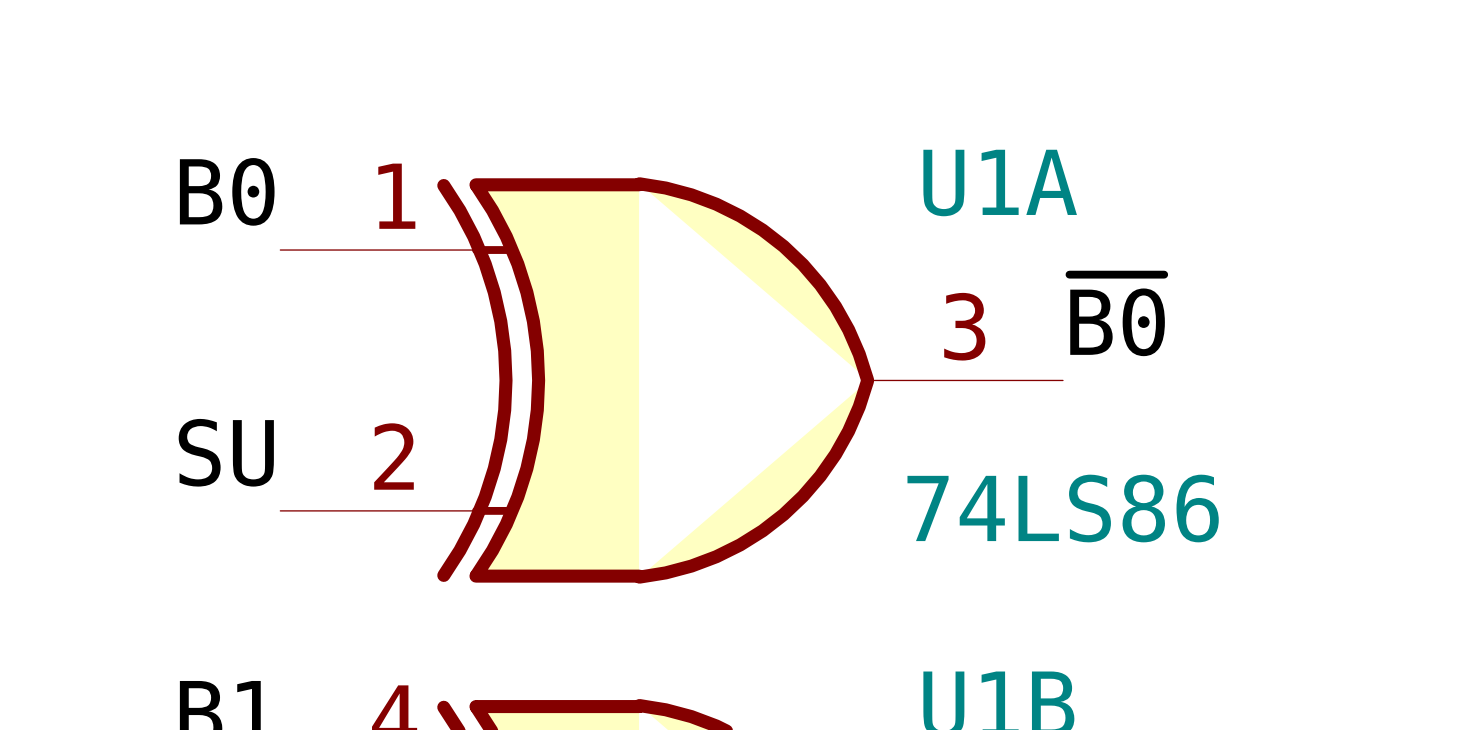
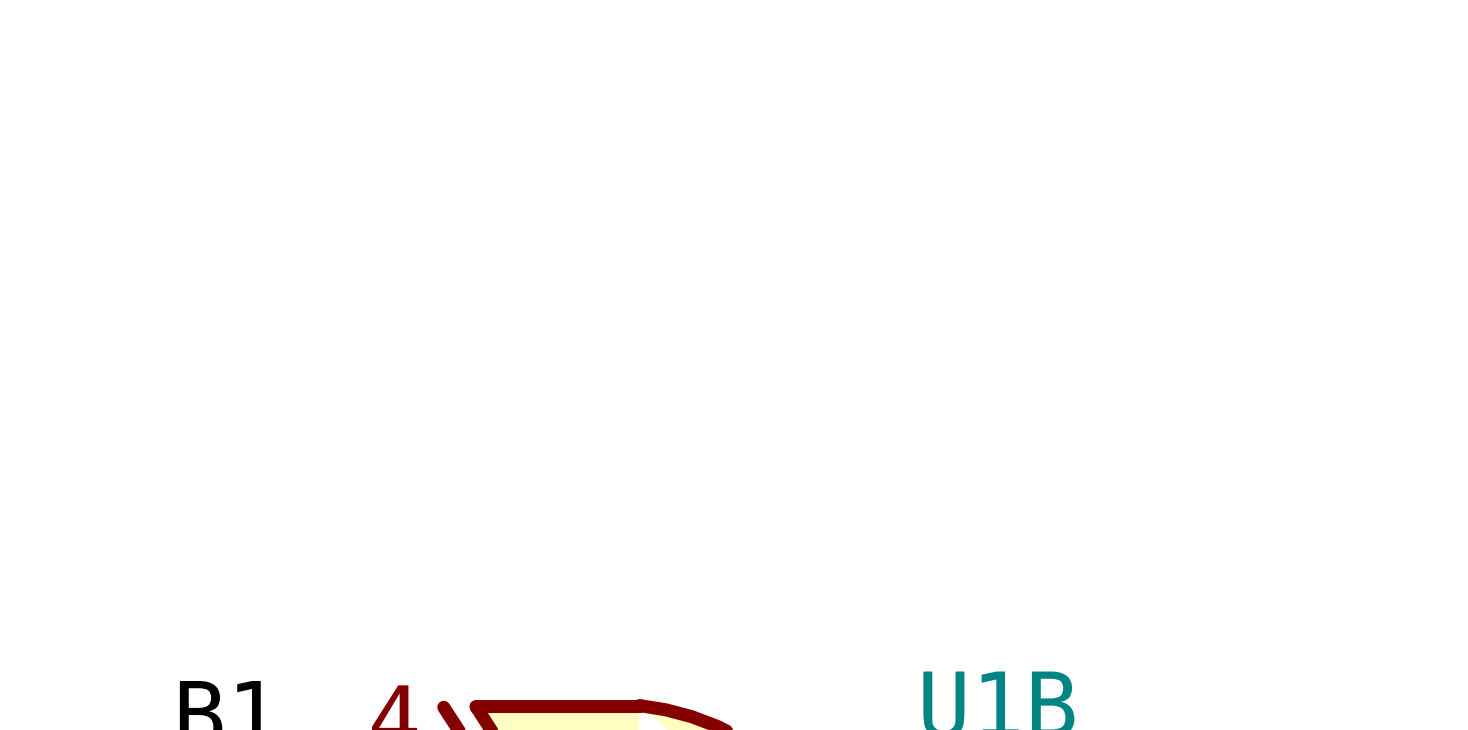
label: B0 (227, 191) -> none
label: ~{B0} (1117, 315) -> none
U1A: 74LS86 (671, 380) -> none
label: SU (226, 452) -> none

